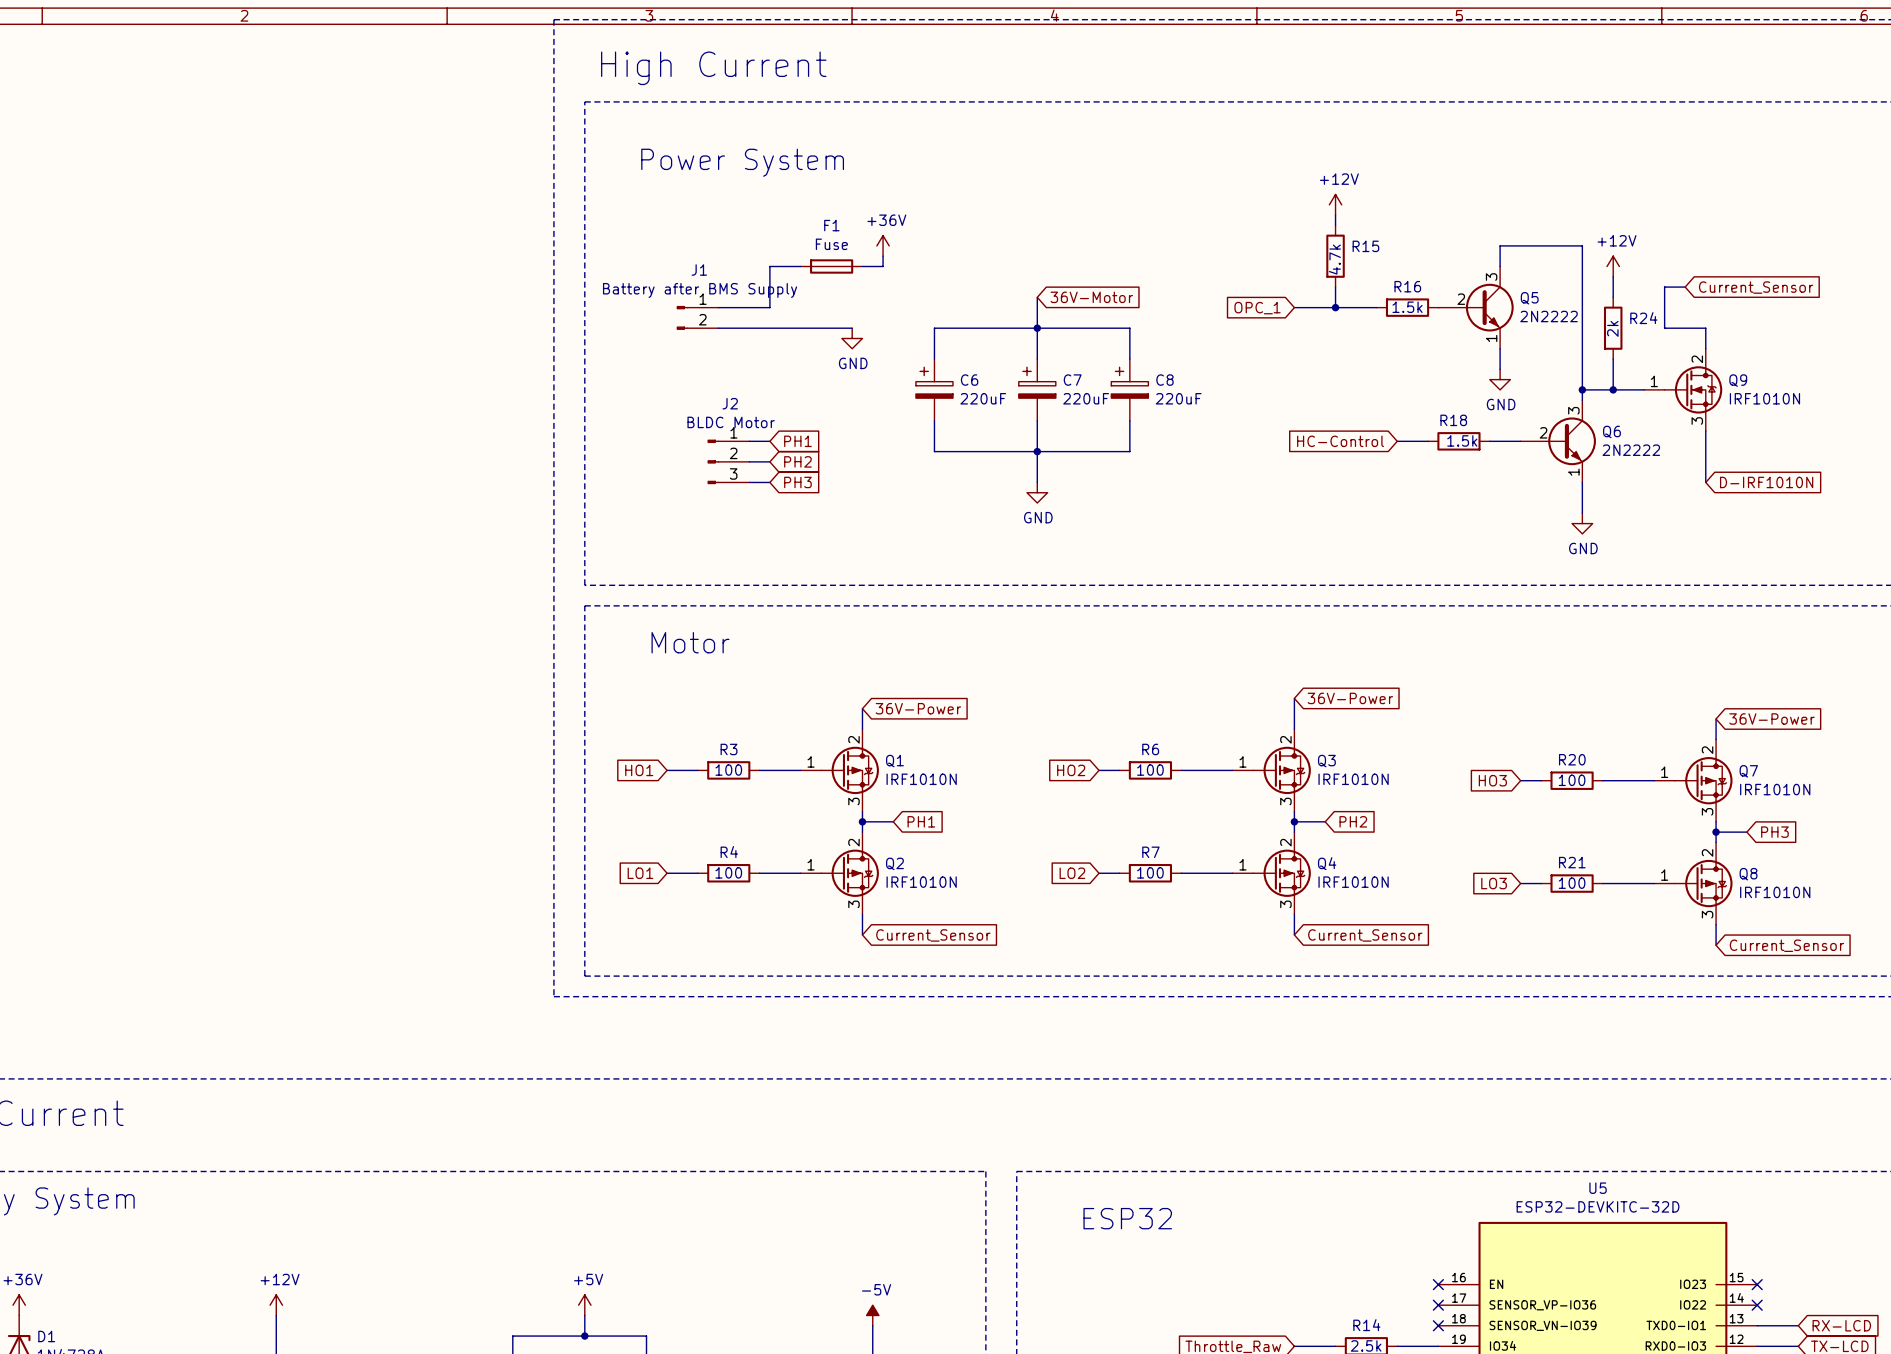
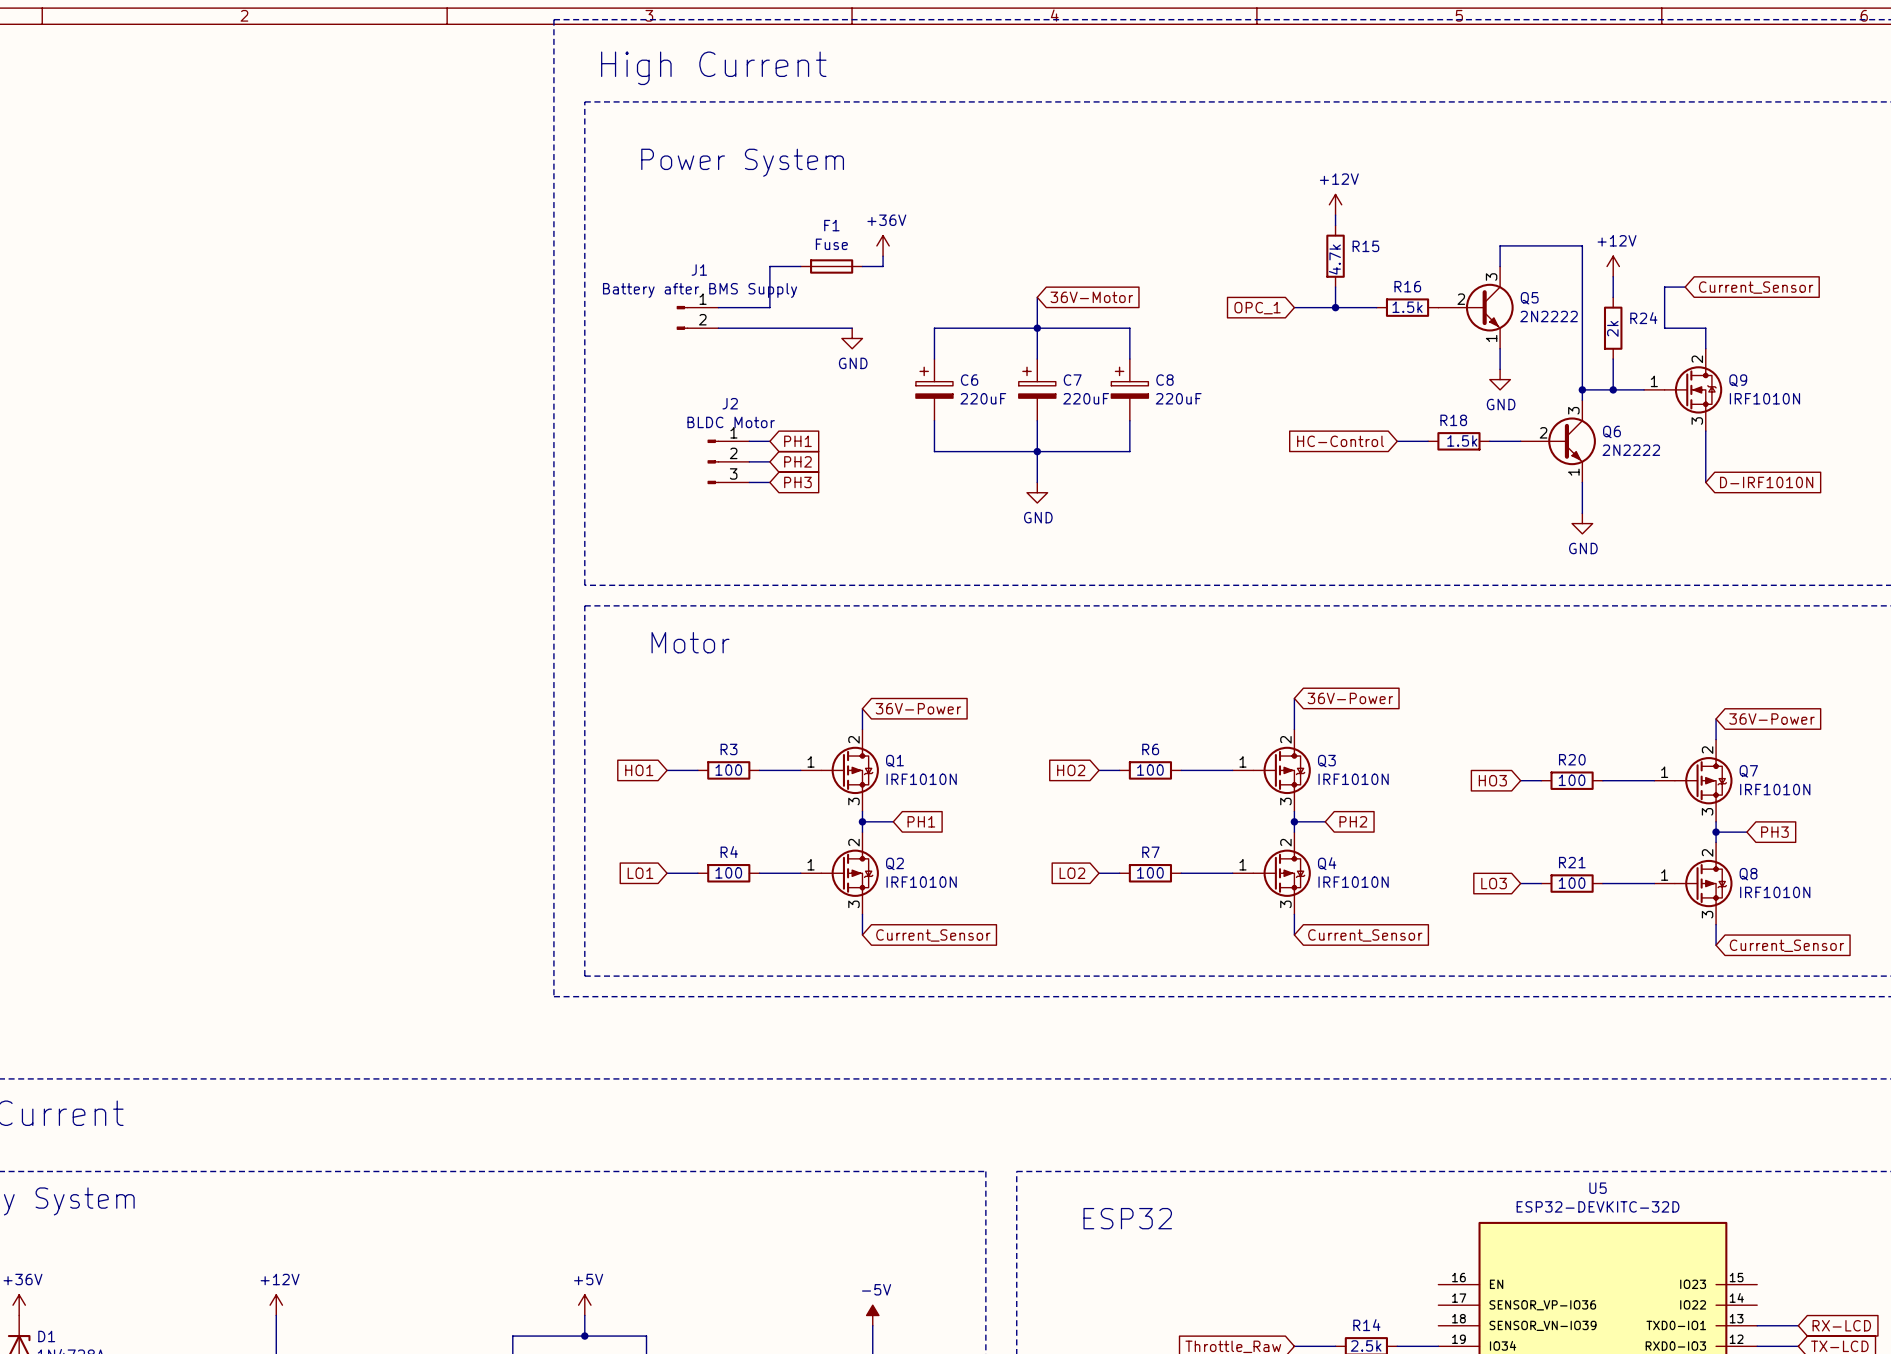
no-connect mark: (1438, 1284) -> none
no-connect mark: (1757, 1284) -> none
no-connect mark: (1438, 1305) -> none
no-connect mark: (1757, 1305) -> none
no-connect mark: (1438, 1325) -> none

